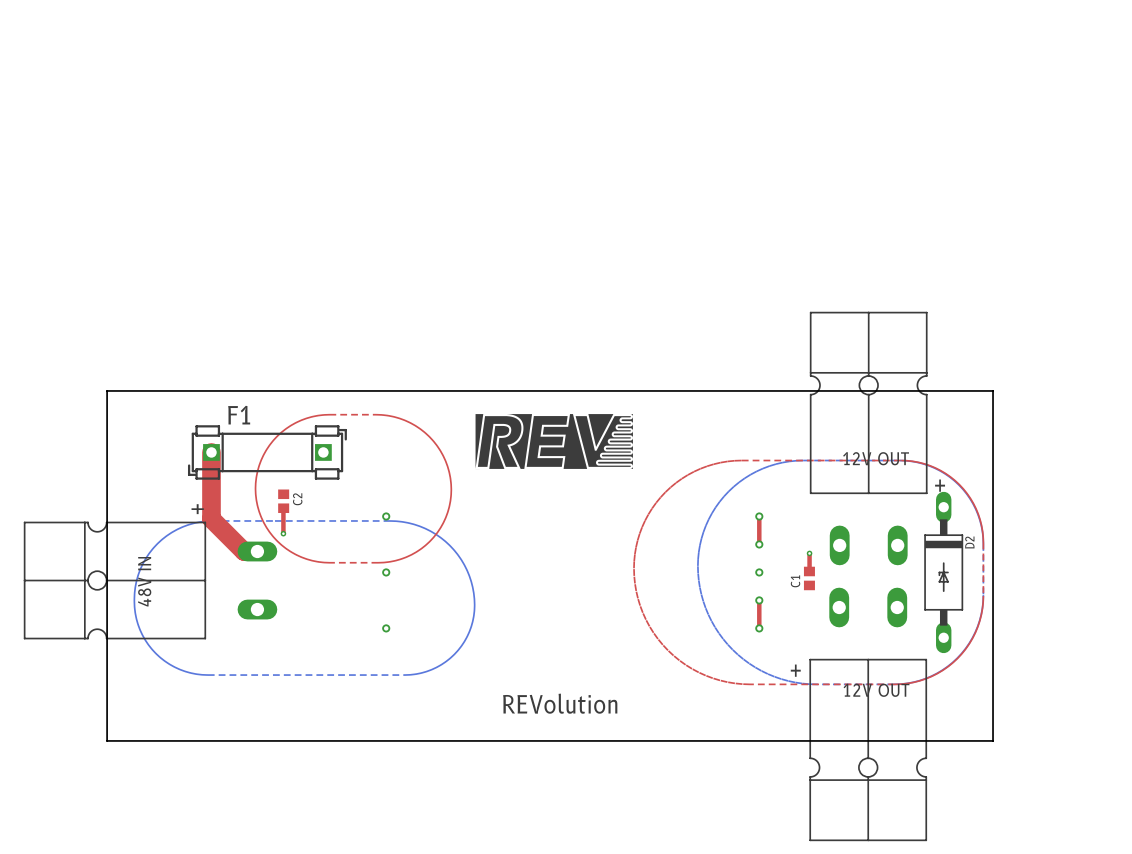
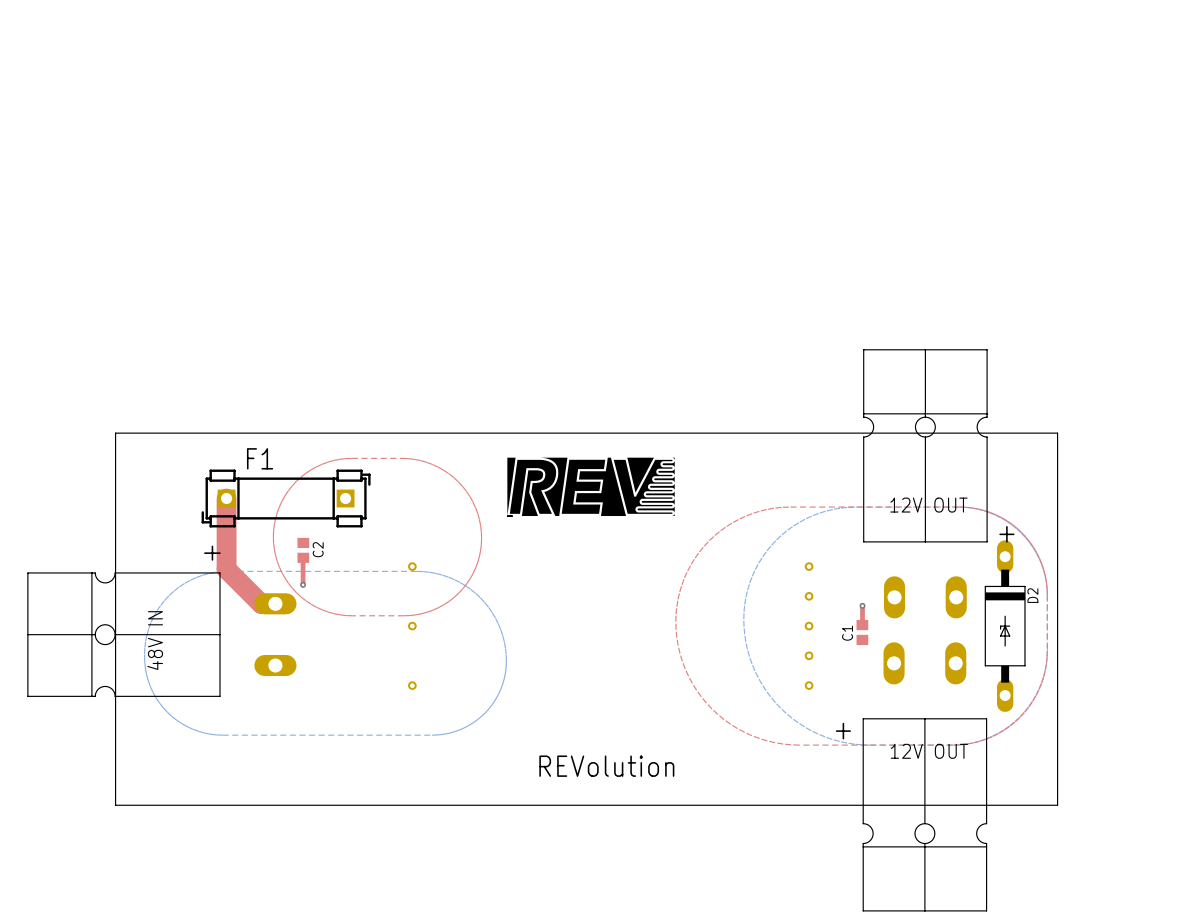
top track: (759, 516) (759, 544) -> none
top track: (759, 600) (759, 628) -> none

